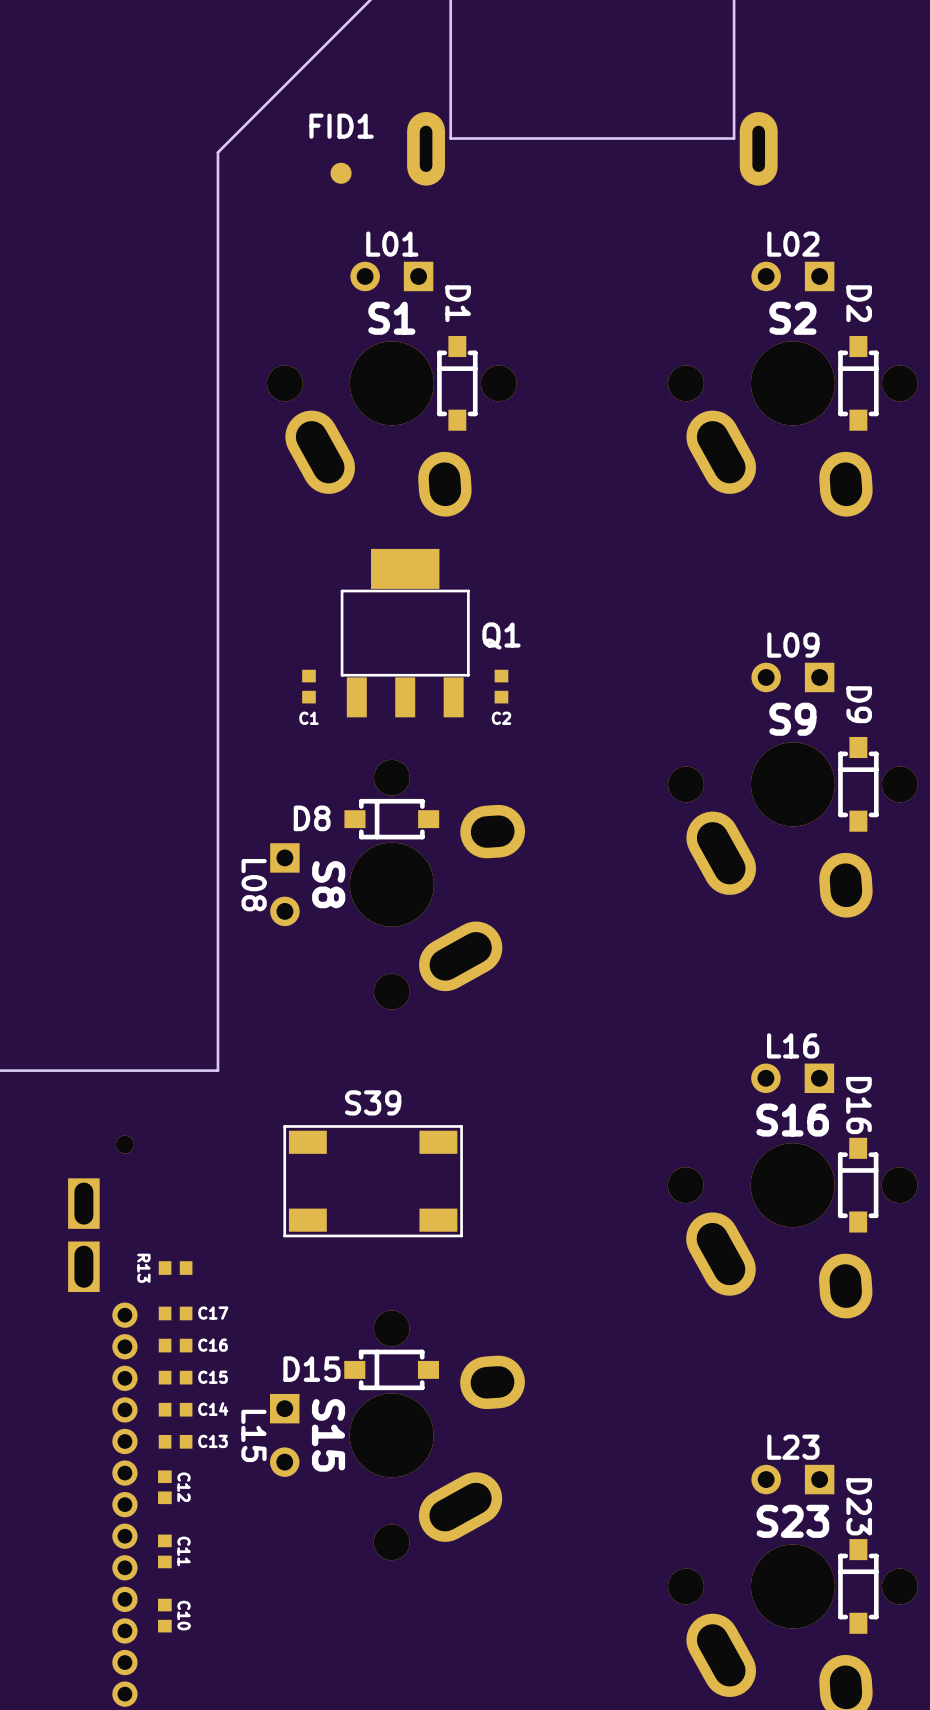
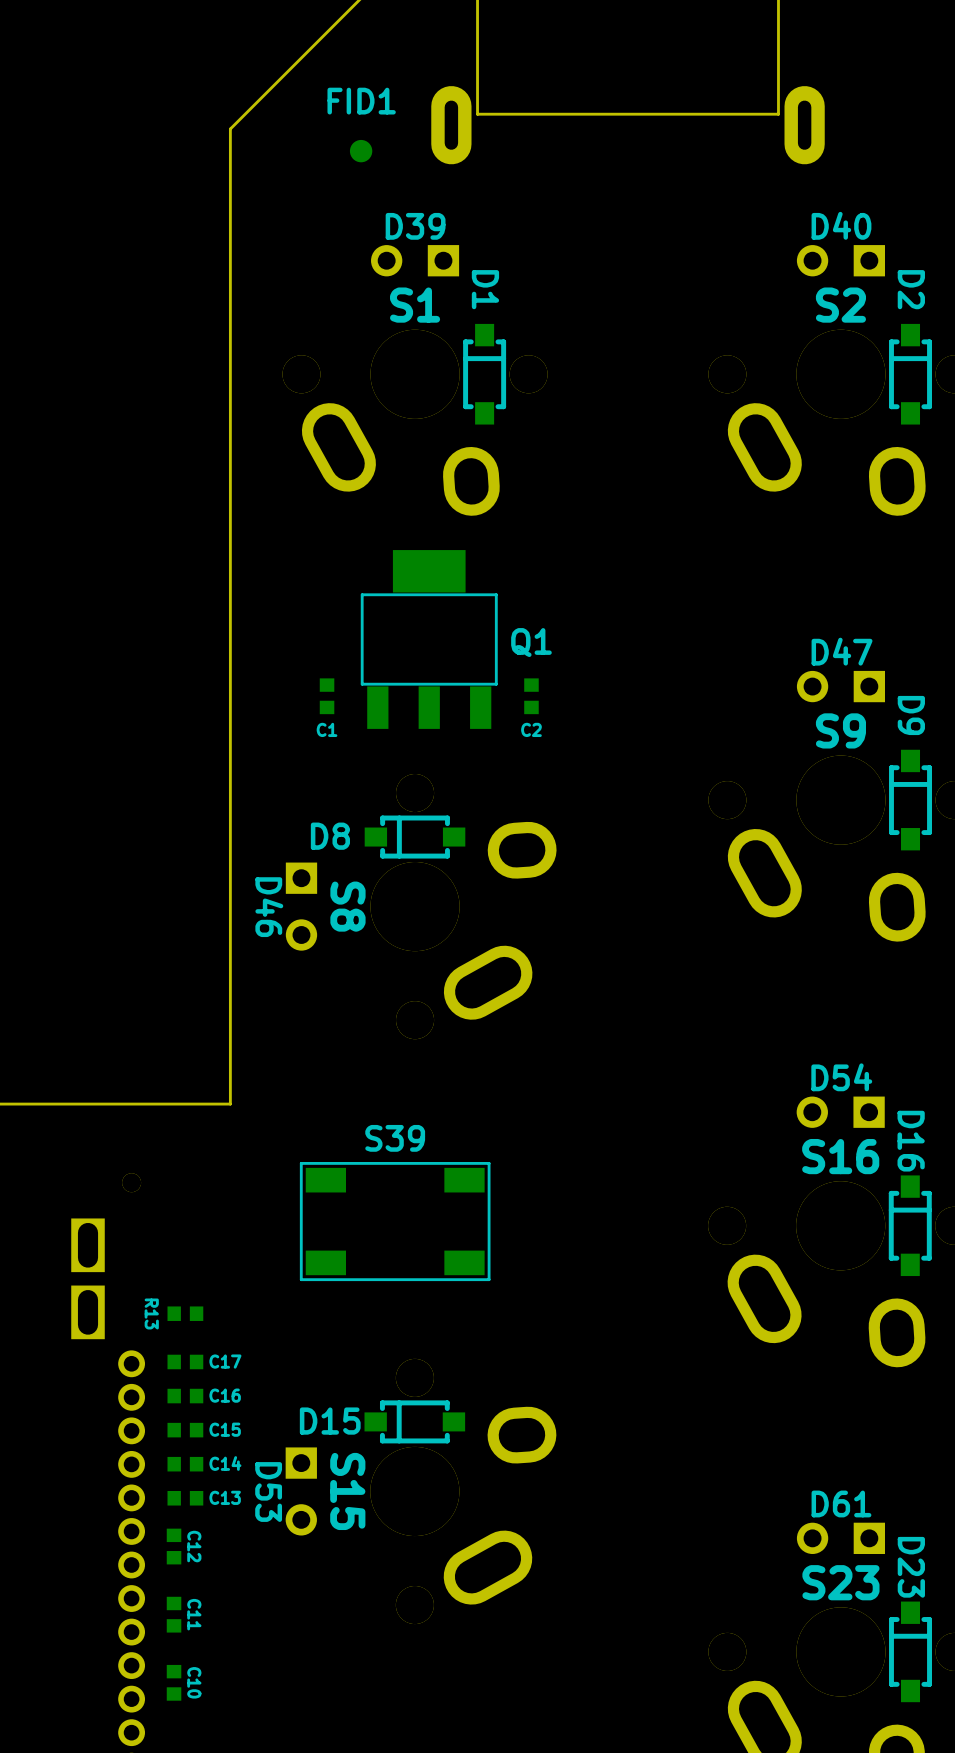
L01 name: L01 (392, 244) -> D39 (415, 226)
L02 name: L02 (793, 244) -> D40 (841, 225)
L09 name: L09 (793, 645) -> D47 (842, 651)
L08 name: L08 (254, 885) -> D46 (269, 907)
L16 name: L16 (793, 1045) -> D54 (841, 1077)
L15 name: L15 (253, 1435) -> D53 (268, 1492)
L23 name: L23 (793, 1447) -> D61 (841, 1503)

